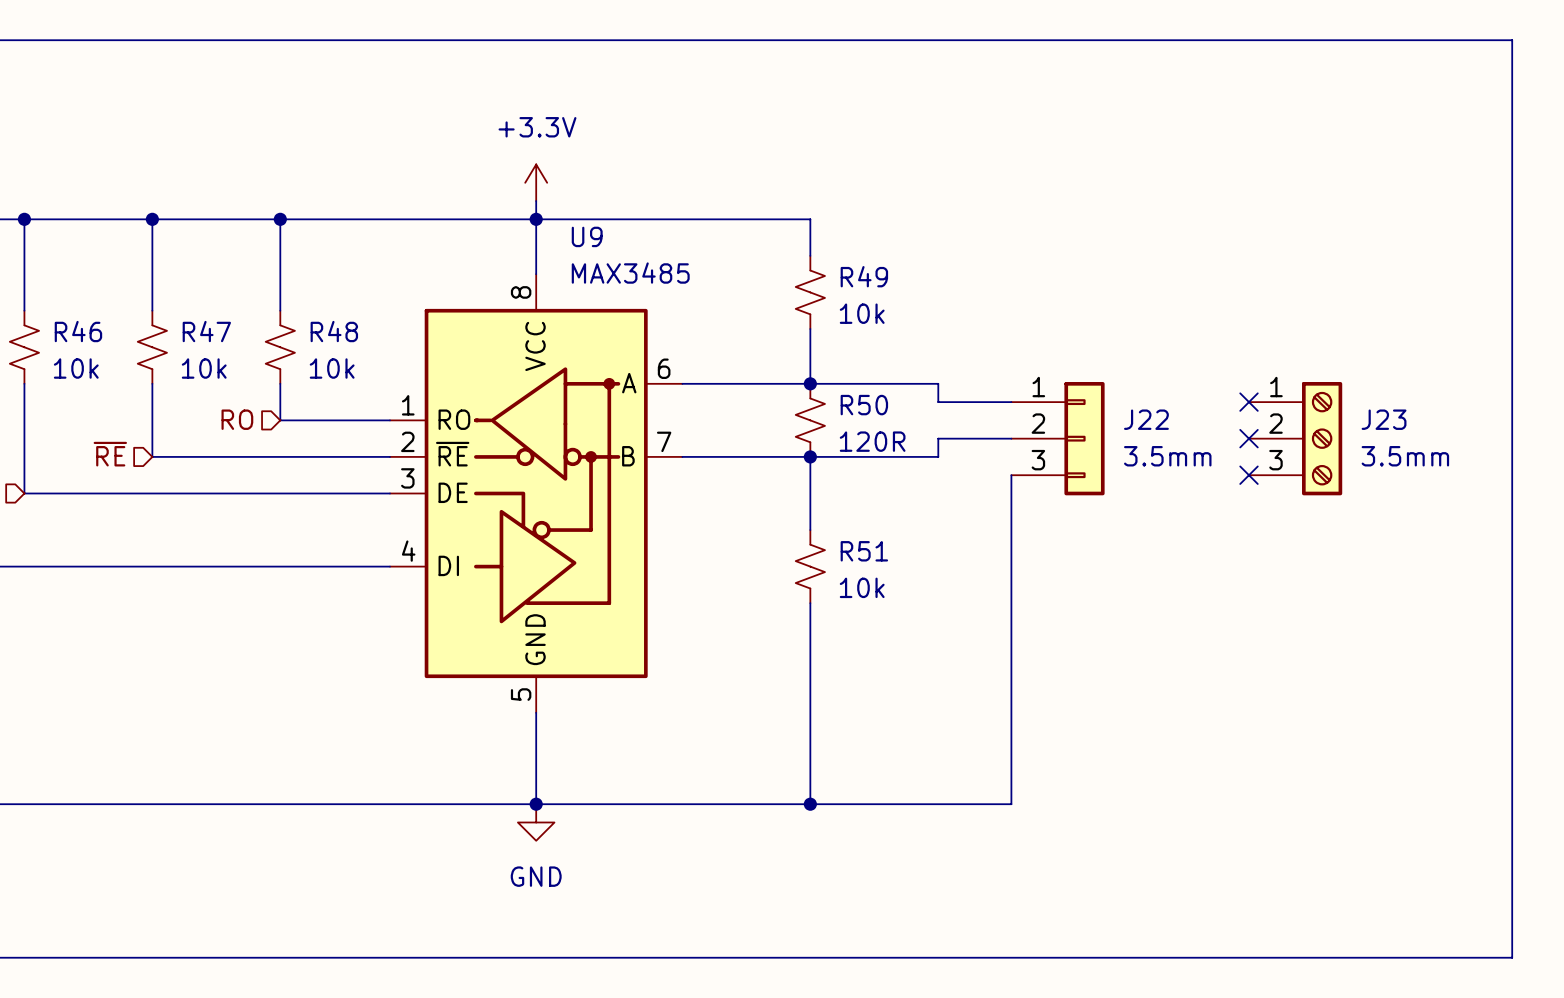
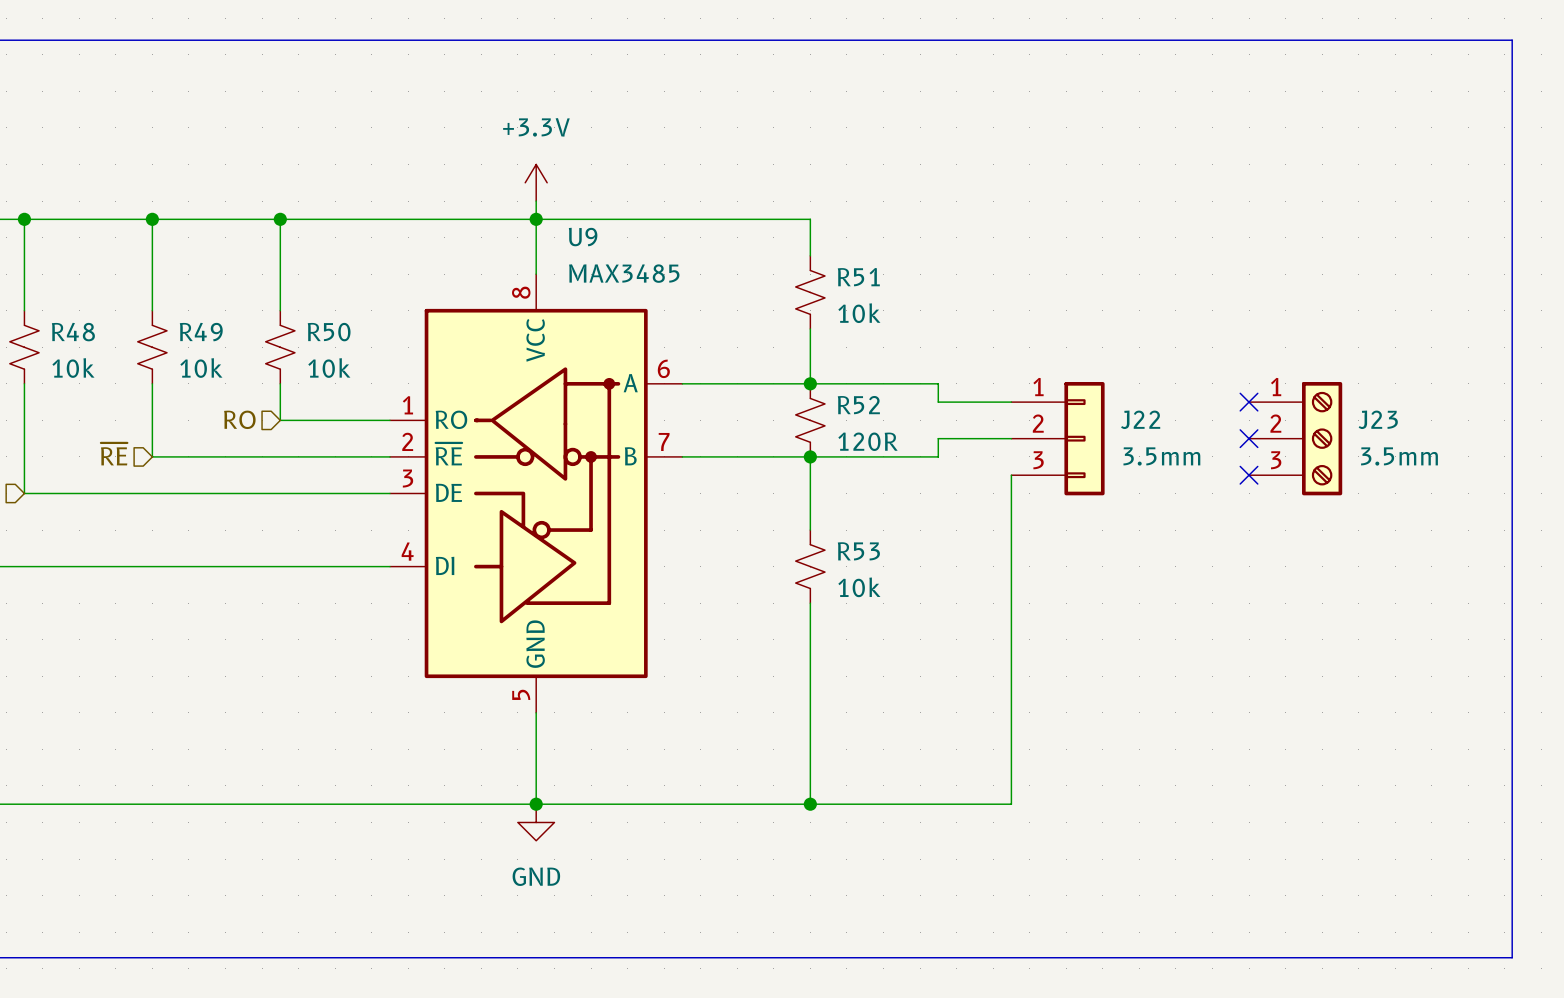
R49 name: R49 (864, 276) -> R51 (858, 277)
R46 name: R46 (78, 331) -> R48 (73, 332)
R47 name: R47 (206, 331) -> R49 (201, 332)
R48 name: R48 (334, 331) -> R50 (329, 332)
R50 name: R50 (864, 405) -> R52 (858, 405)
R51 name: R51 (864, 551) -> R53 (858, 551)

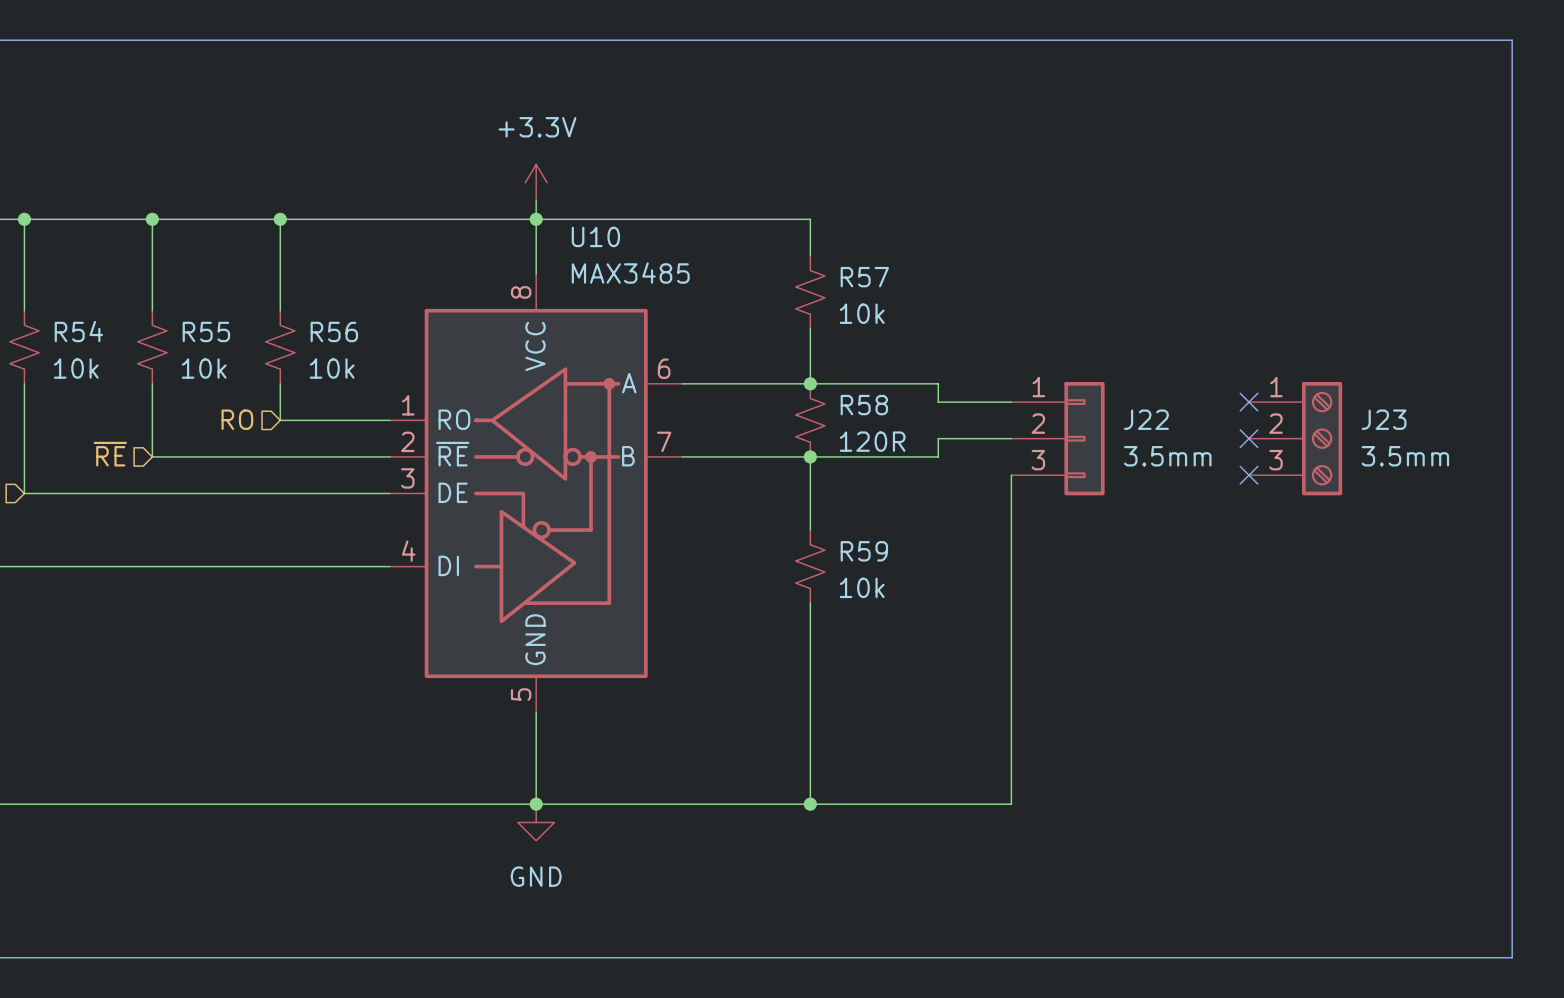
U9 name: U9 (583, 237) -> U10 (595, 236)
R51 name: R51 (858, 277) -> R57 (864, 277)
R48 name: R48 (73, 332) -> R54 (78, 331)
R49 name: R49 (201, 332) -> R55 (206, 331)
R50 name: R50 (329, 332) -> R56 (334, 331)
R52 name: R52 (858, 405) -> R58 (864, 405)
R53 name: R53 (858, 551) -> R59 (864, 551)

